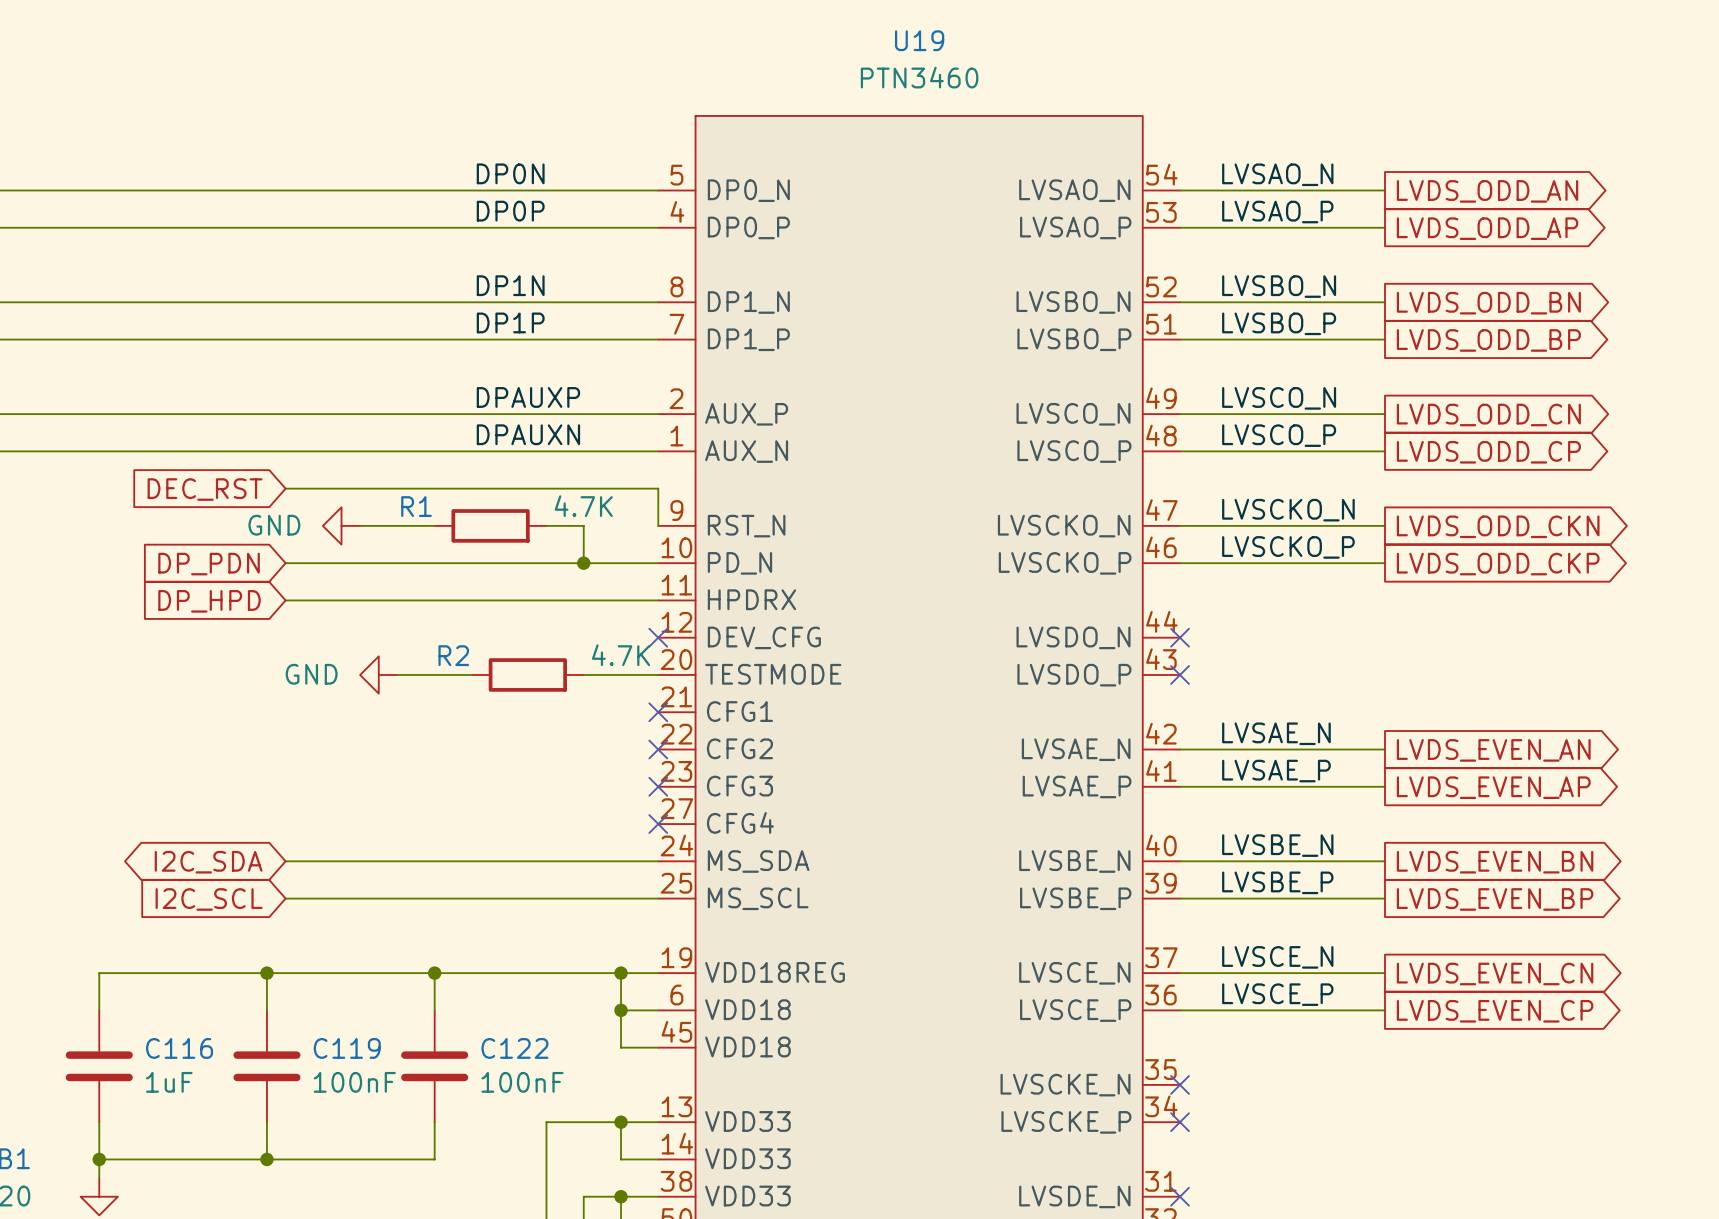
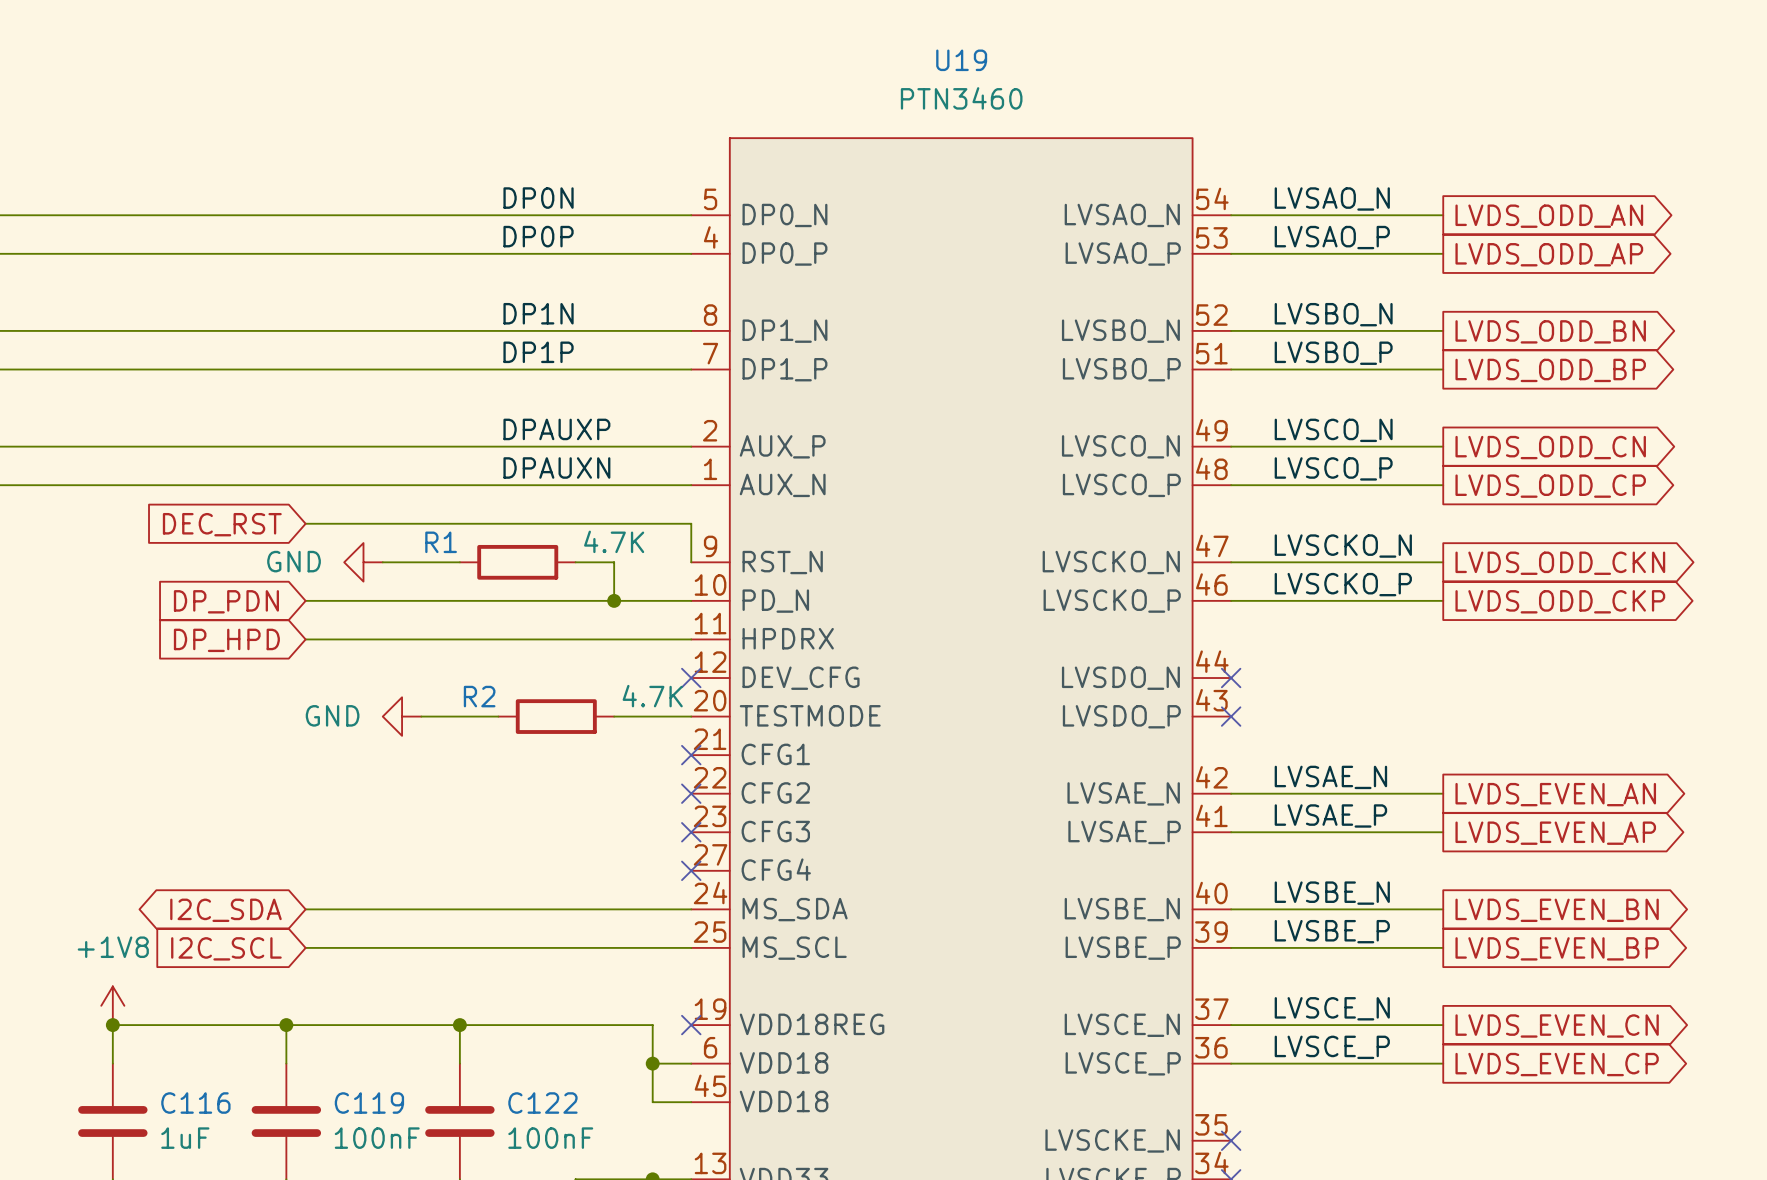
power symbol: none -> +1V8 (112, 1005)
junction: none -> (112, 1025)
wire: (621, 973) (658, 973) -> none
junction: (621, 973) -> none
no-connect mark: none -> (691, 1025)

